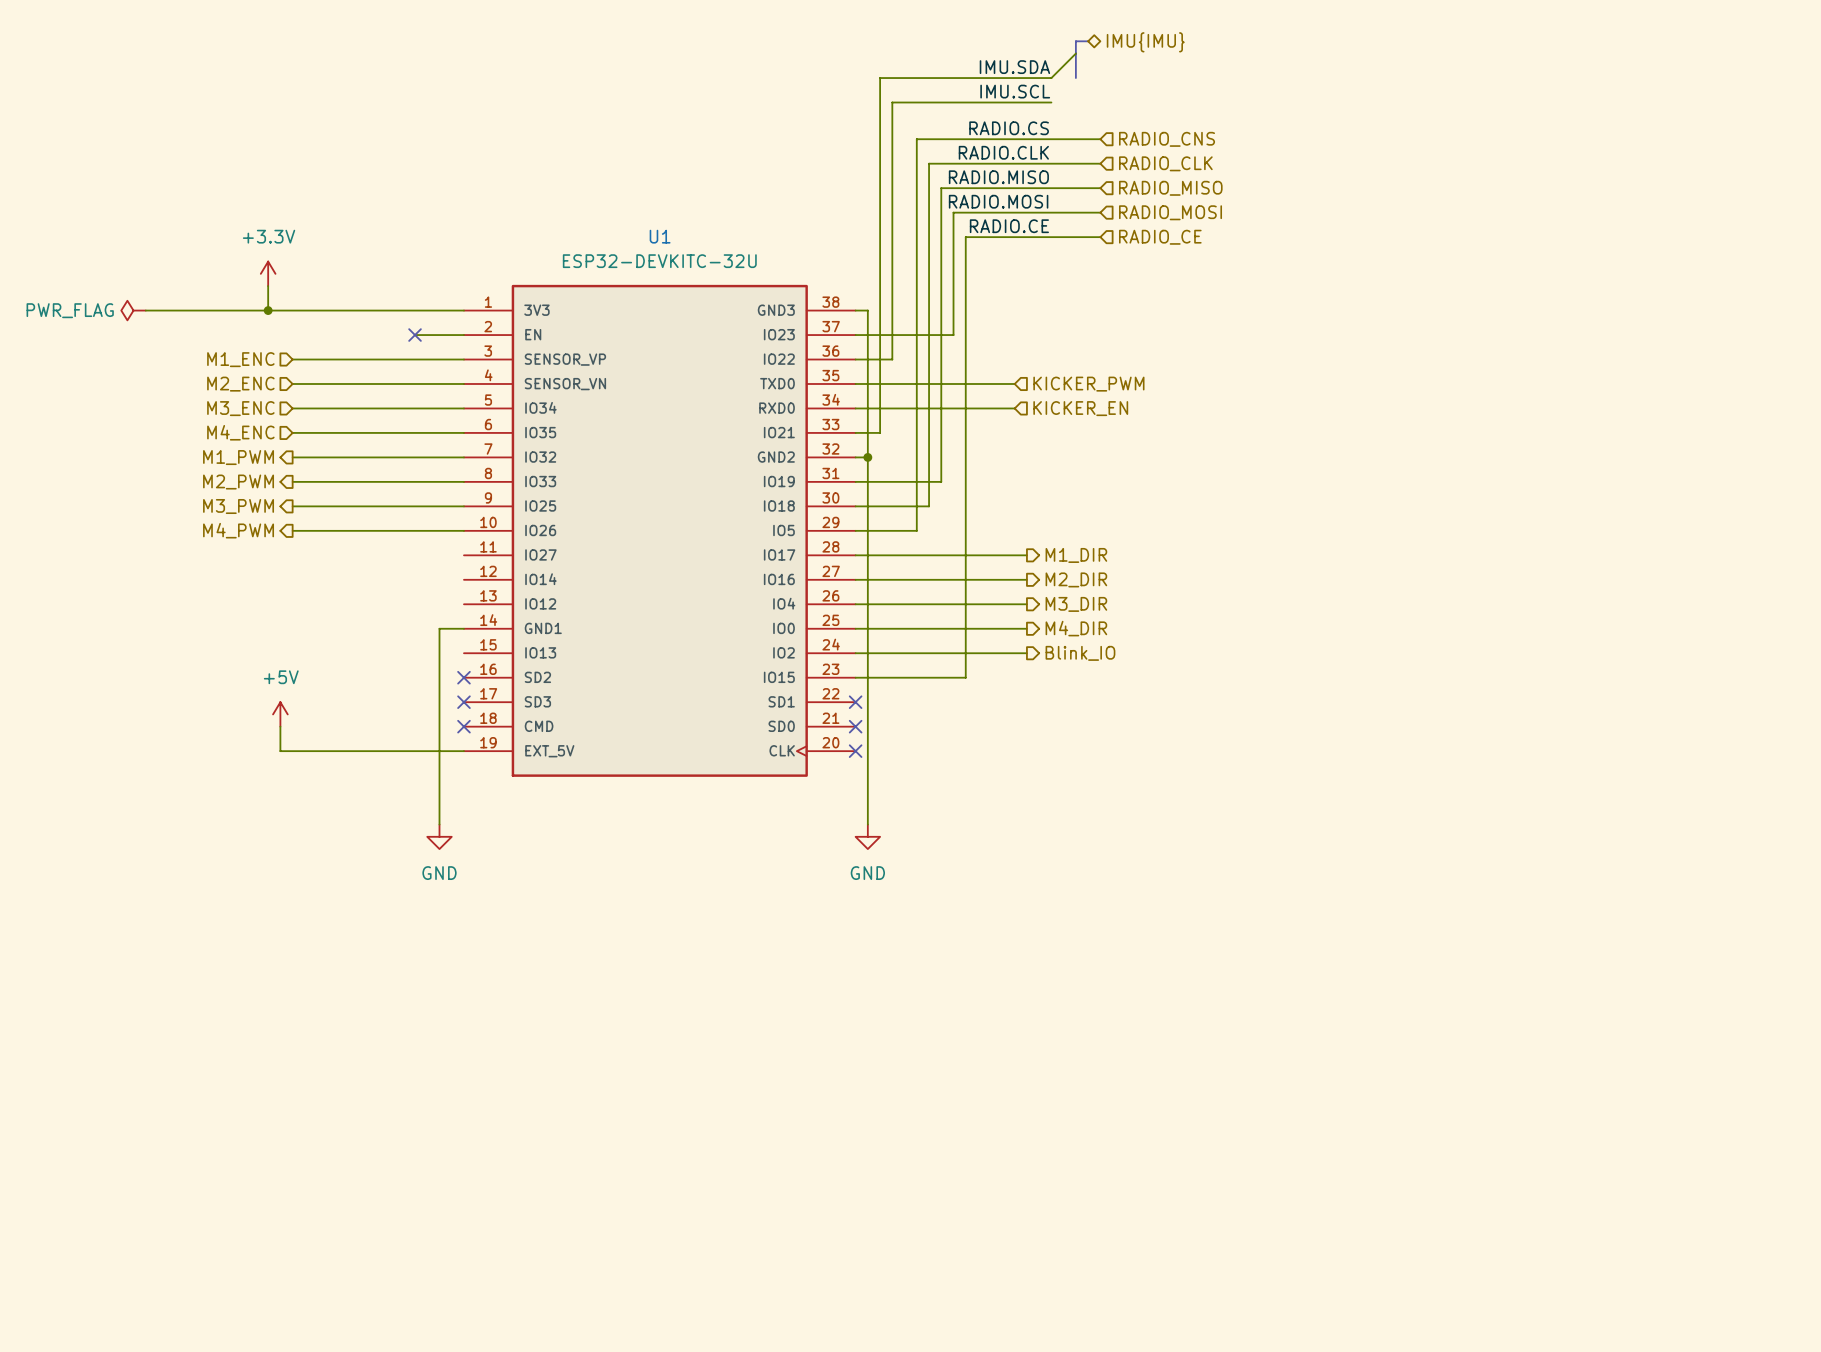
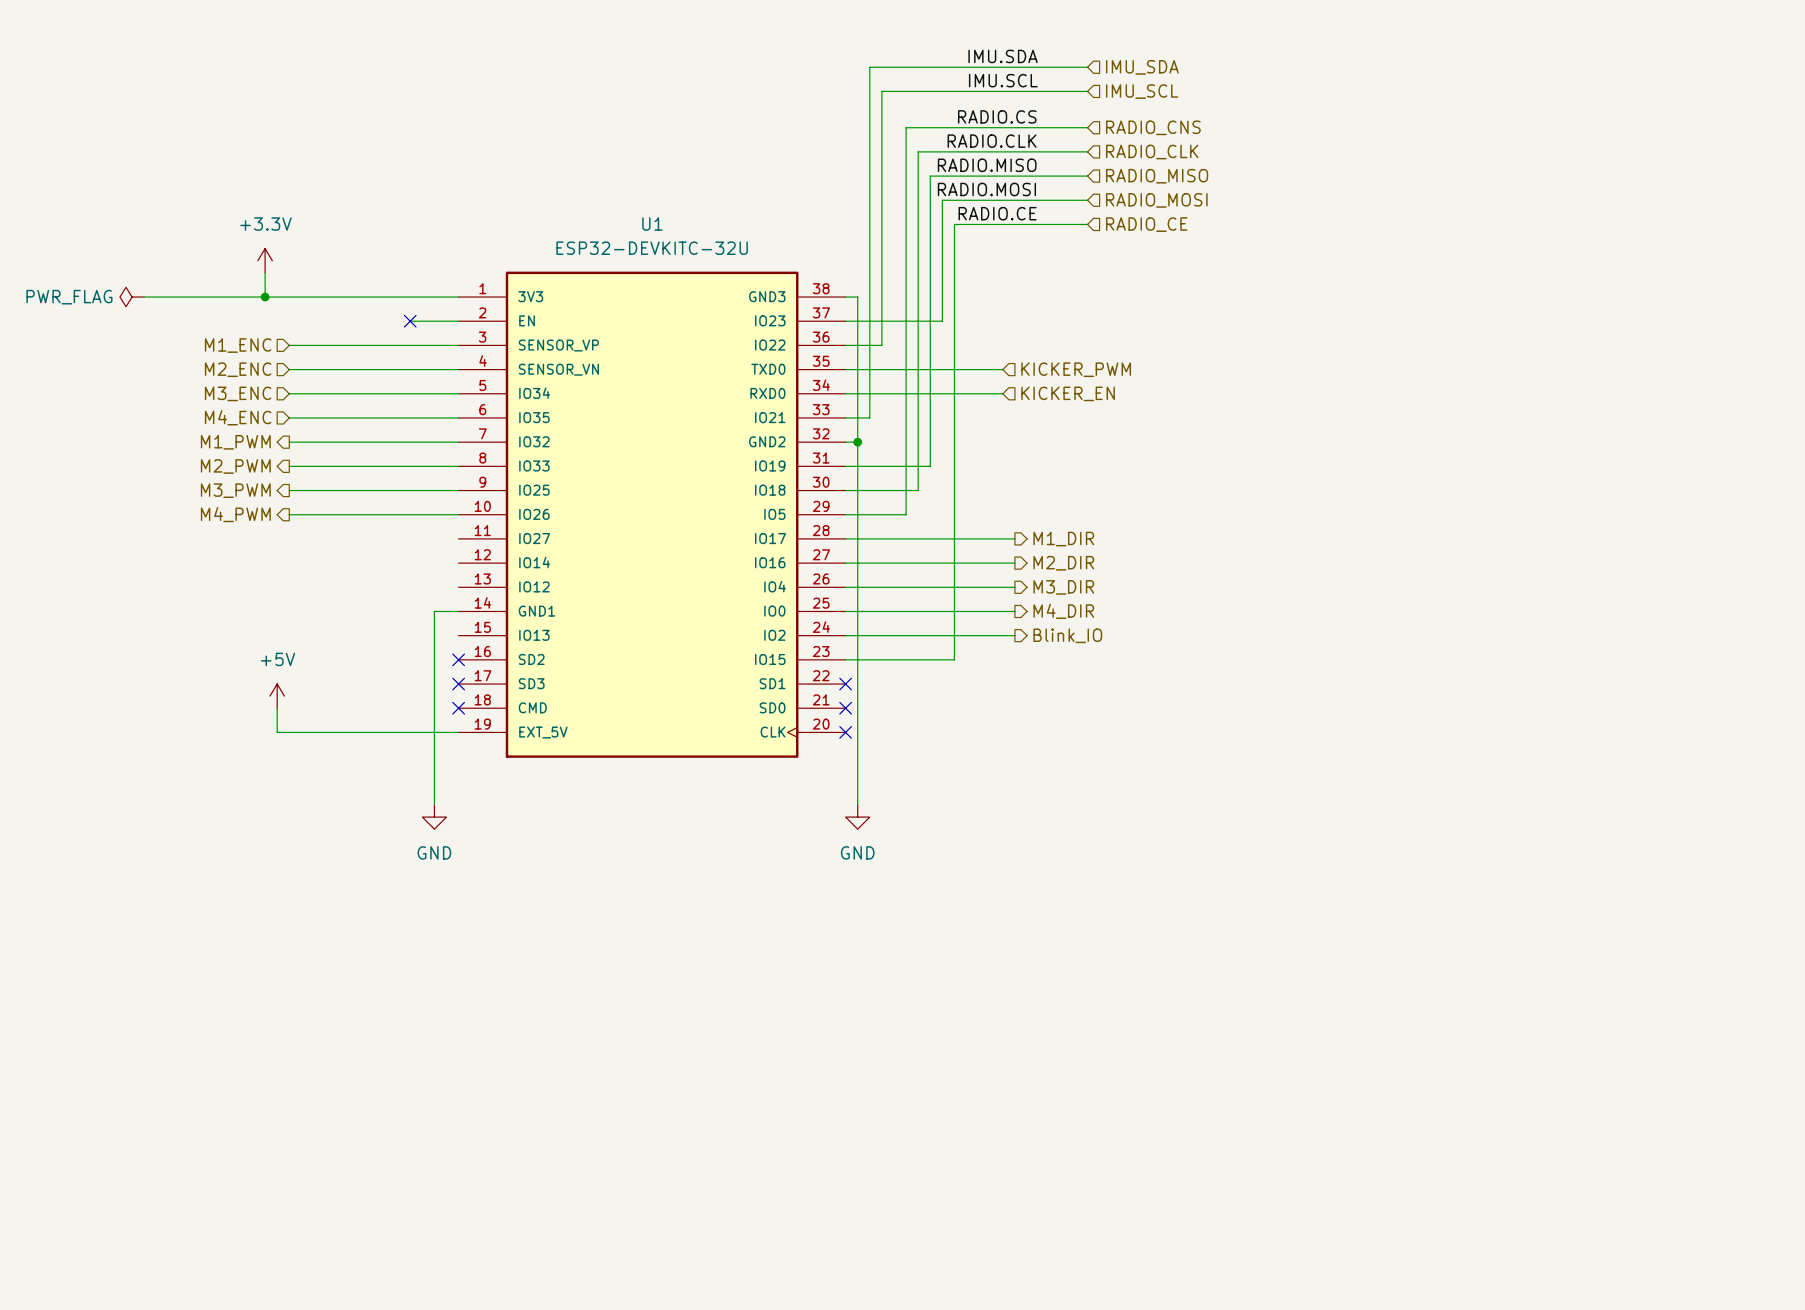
bus: (1088, 41) (1075, 41) (1075, 78) -> none
hierarchical label: IMU{IMU} (1145, 42) -> none
wire: (1075, 53) (1051, 78) -> (1087, 67) (1039, 67)
hierarchical label: none -> IMU_SDA (1142, 67)
wire: none -> (1039, 91) (1087, 91)
hierarchical label: none -> IMU_SCL (1142, 91)

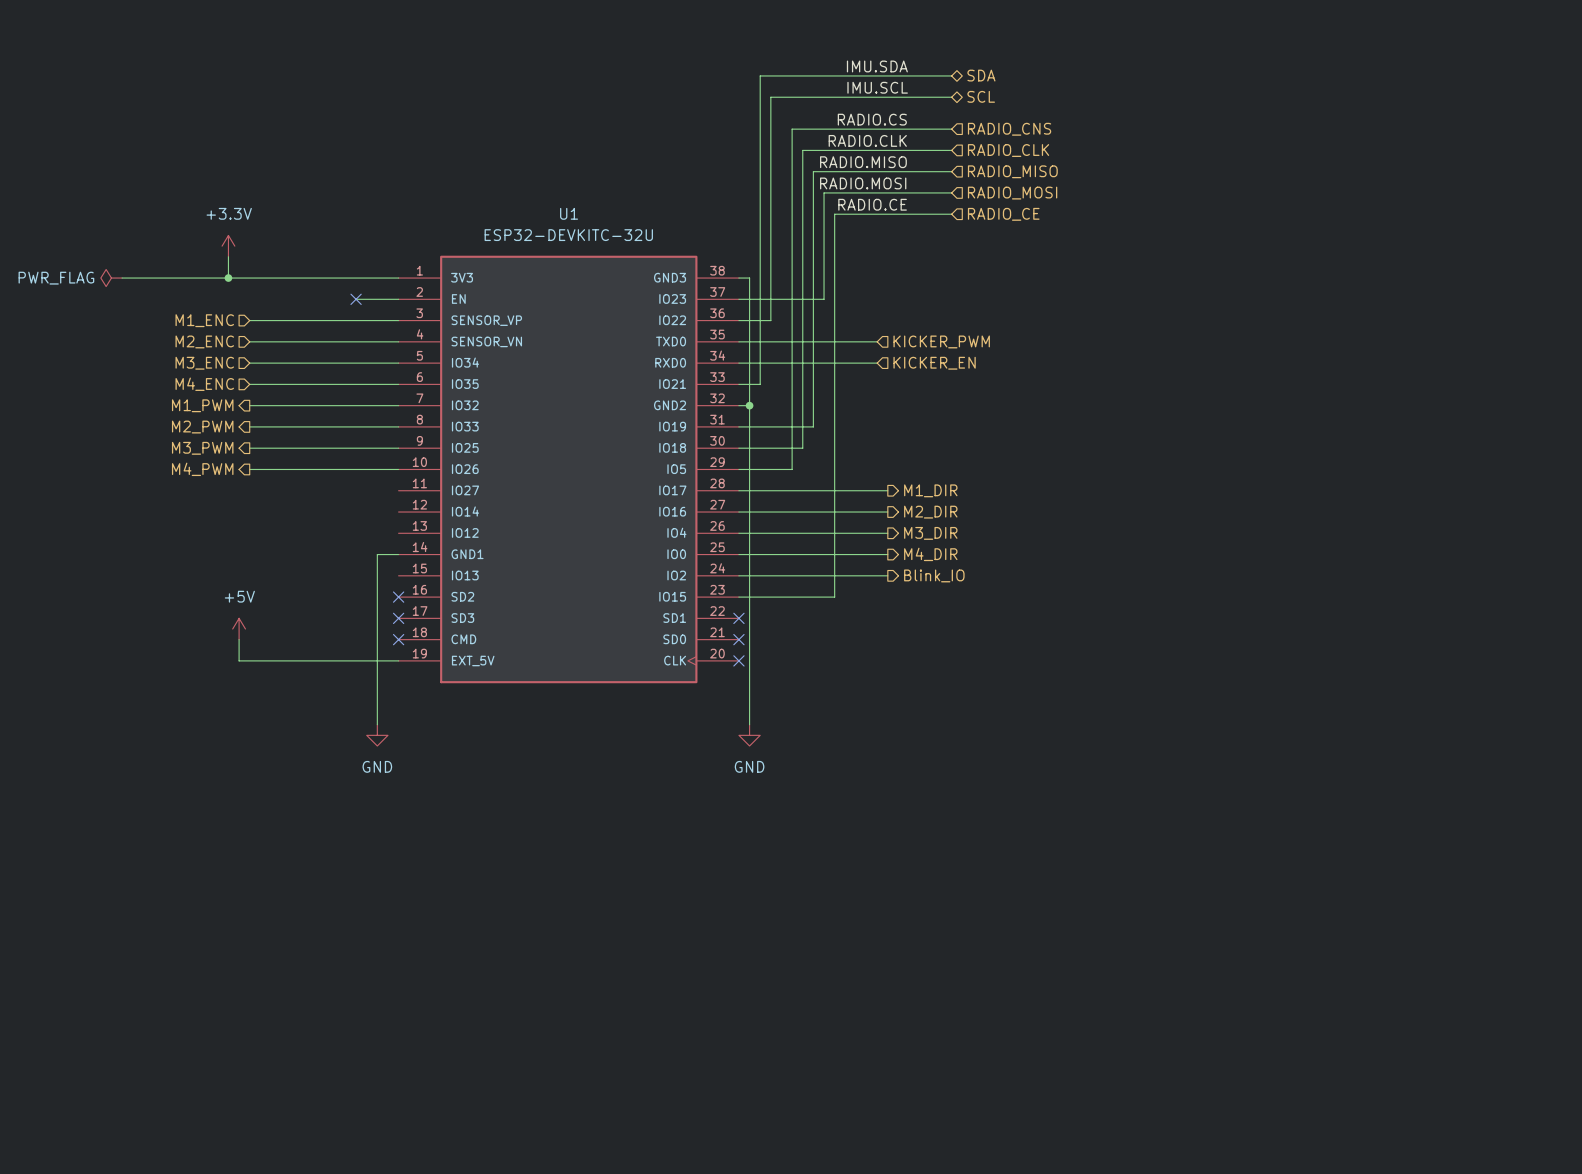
hierarchical label shape: input (1142, 67) -> bidirectional (981, 75)
hierarchical label: IMU_SDA (1142, 67) -> SDA (981, 75)
hierarchical label shape: input (1142, 91) -> bidirectional (981, 96)
hierarchical label: IMU_SCL (1142, 91) -> SCL (981, 96)

